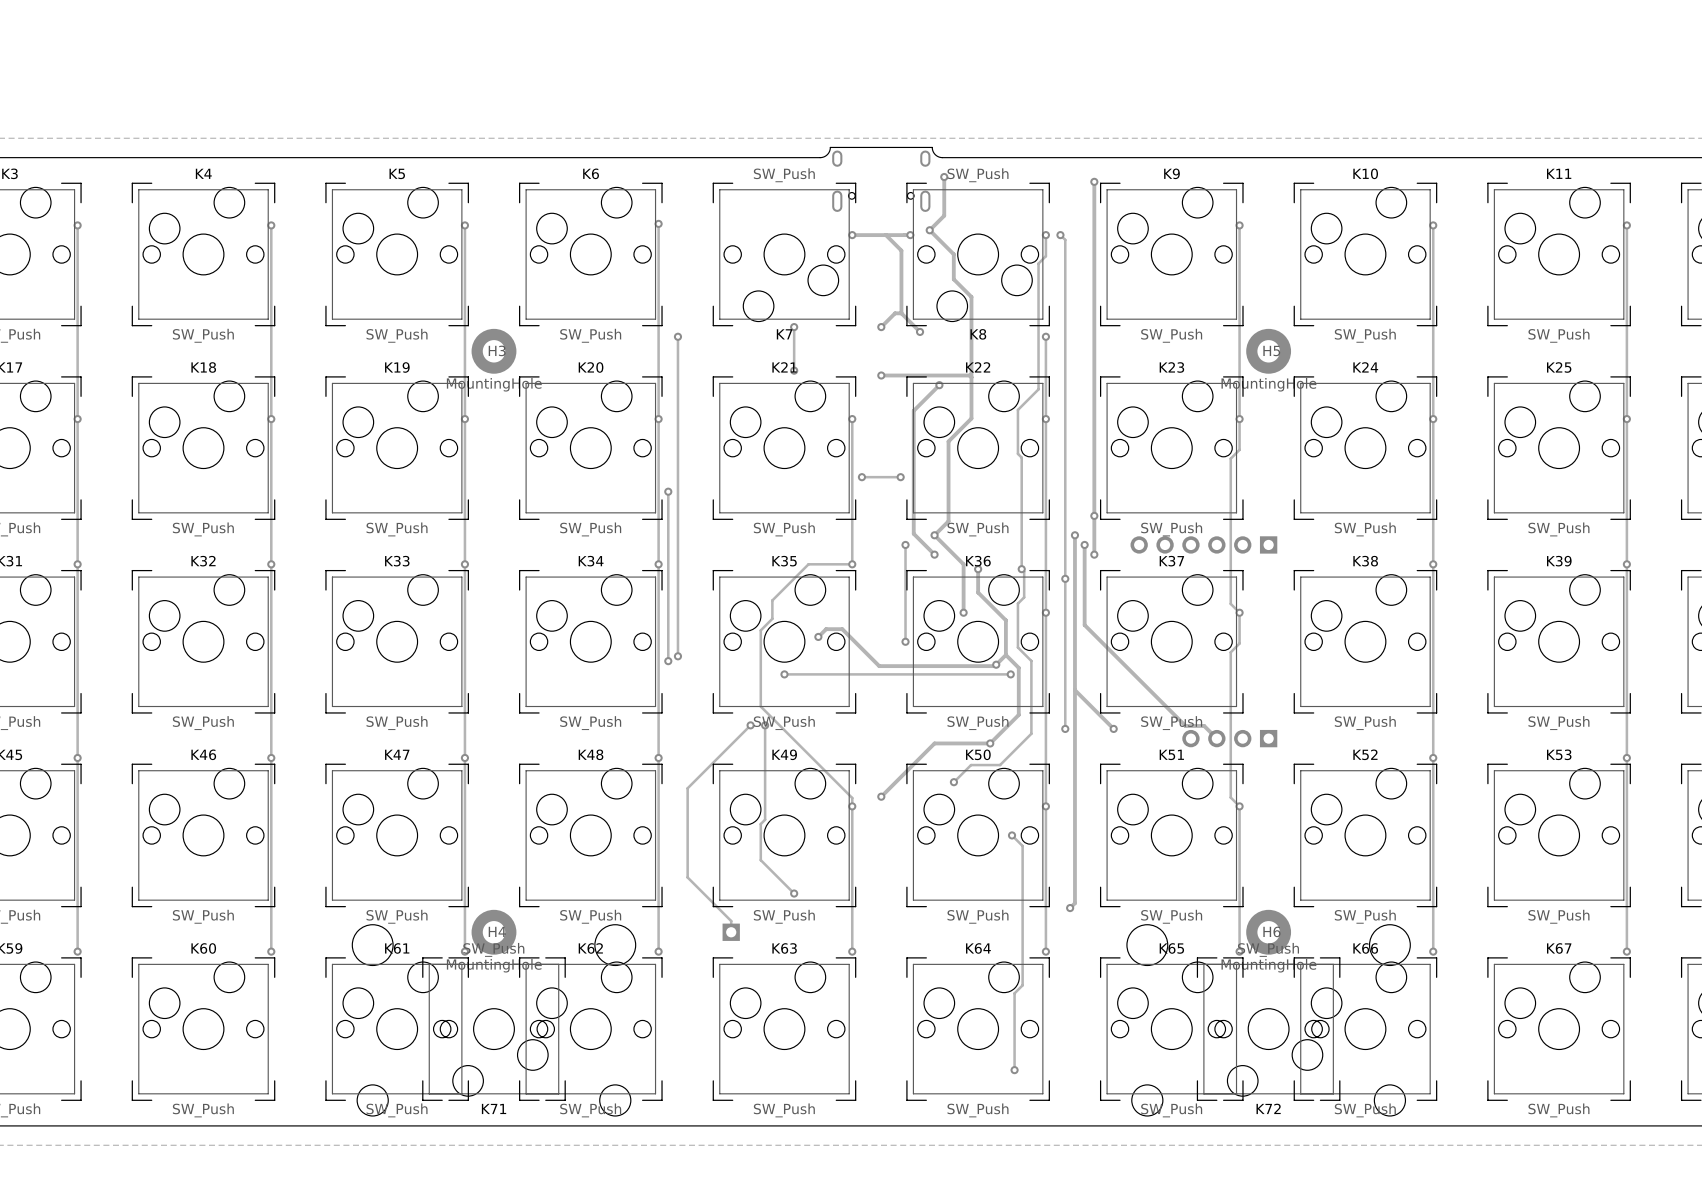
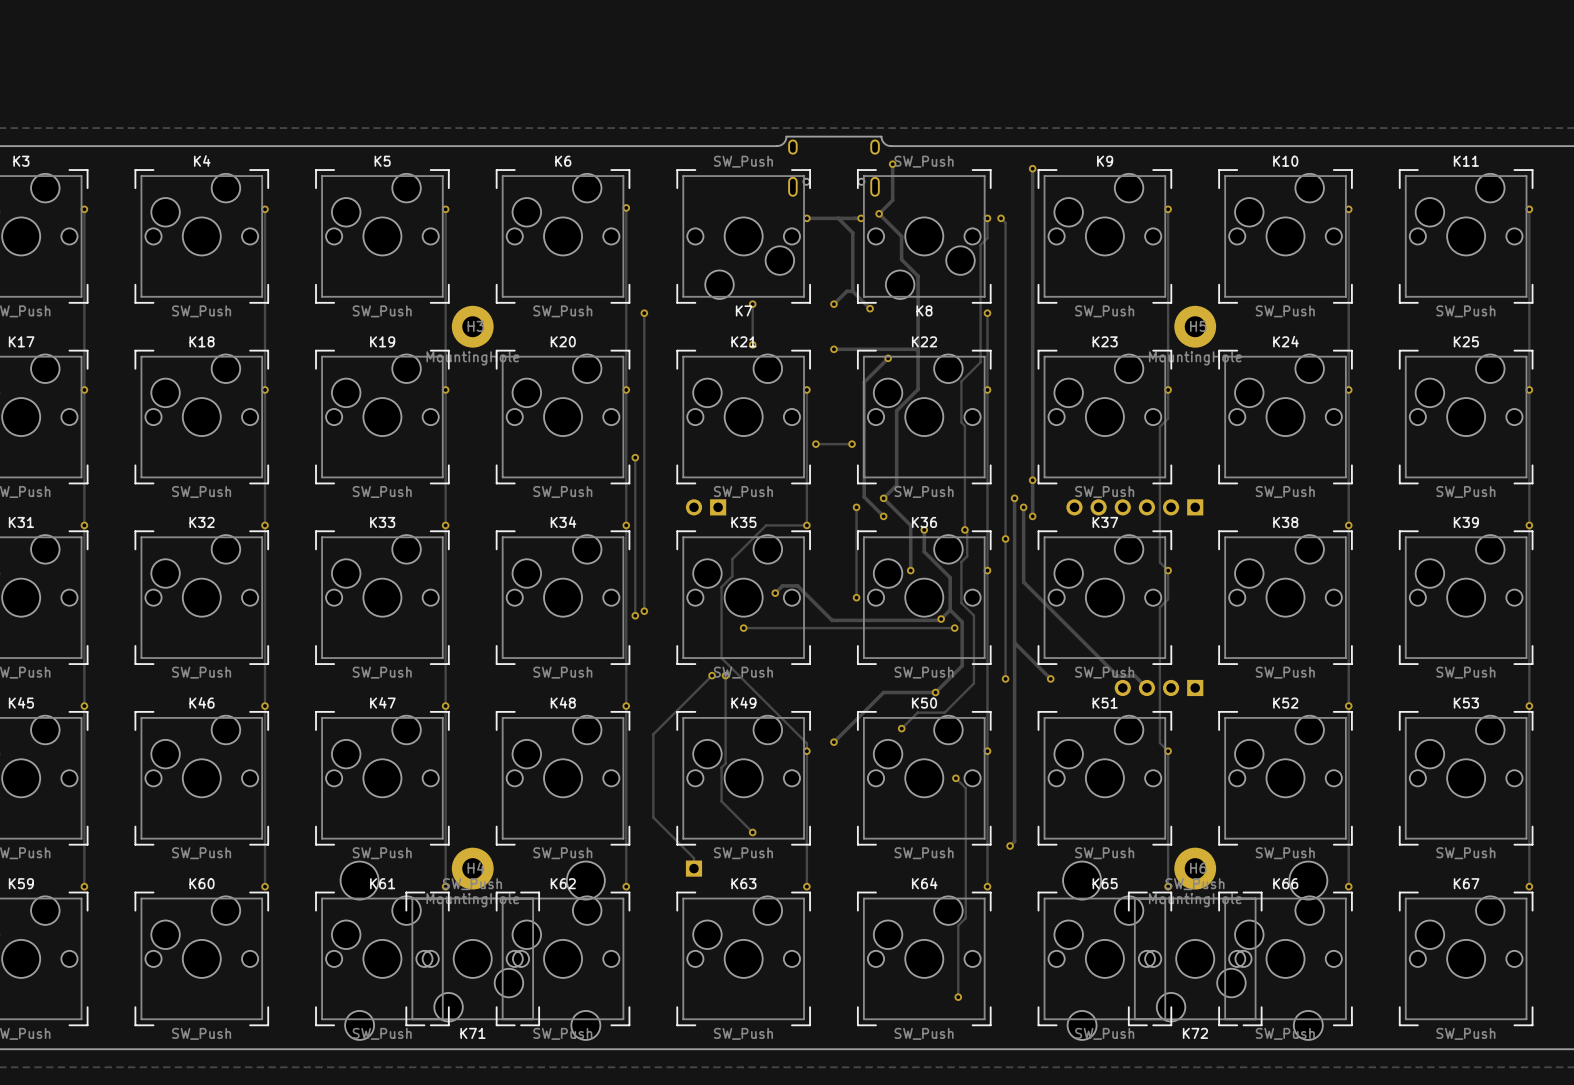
part: none -> (706, 507)

